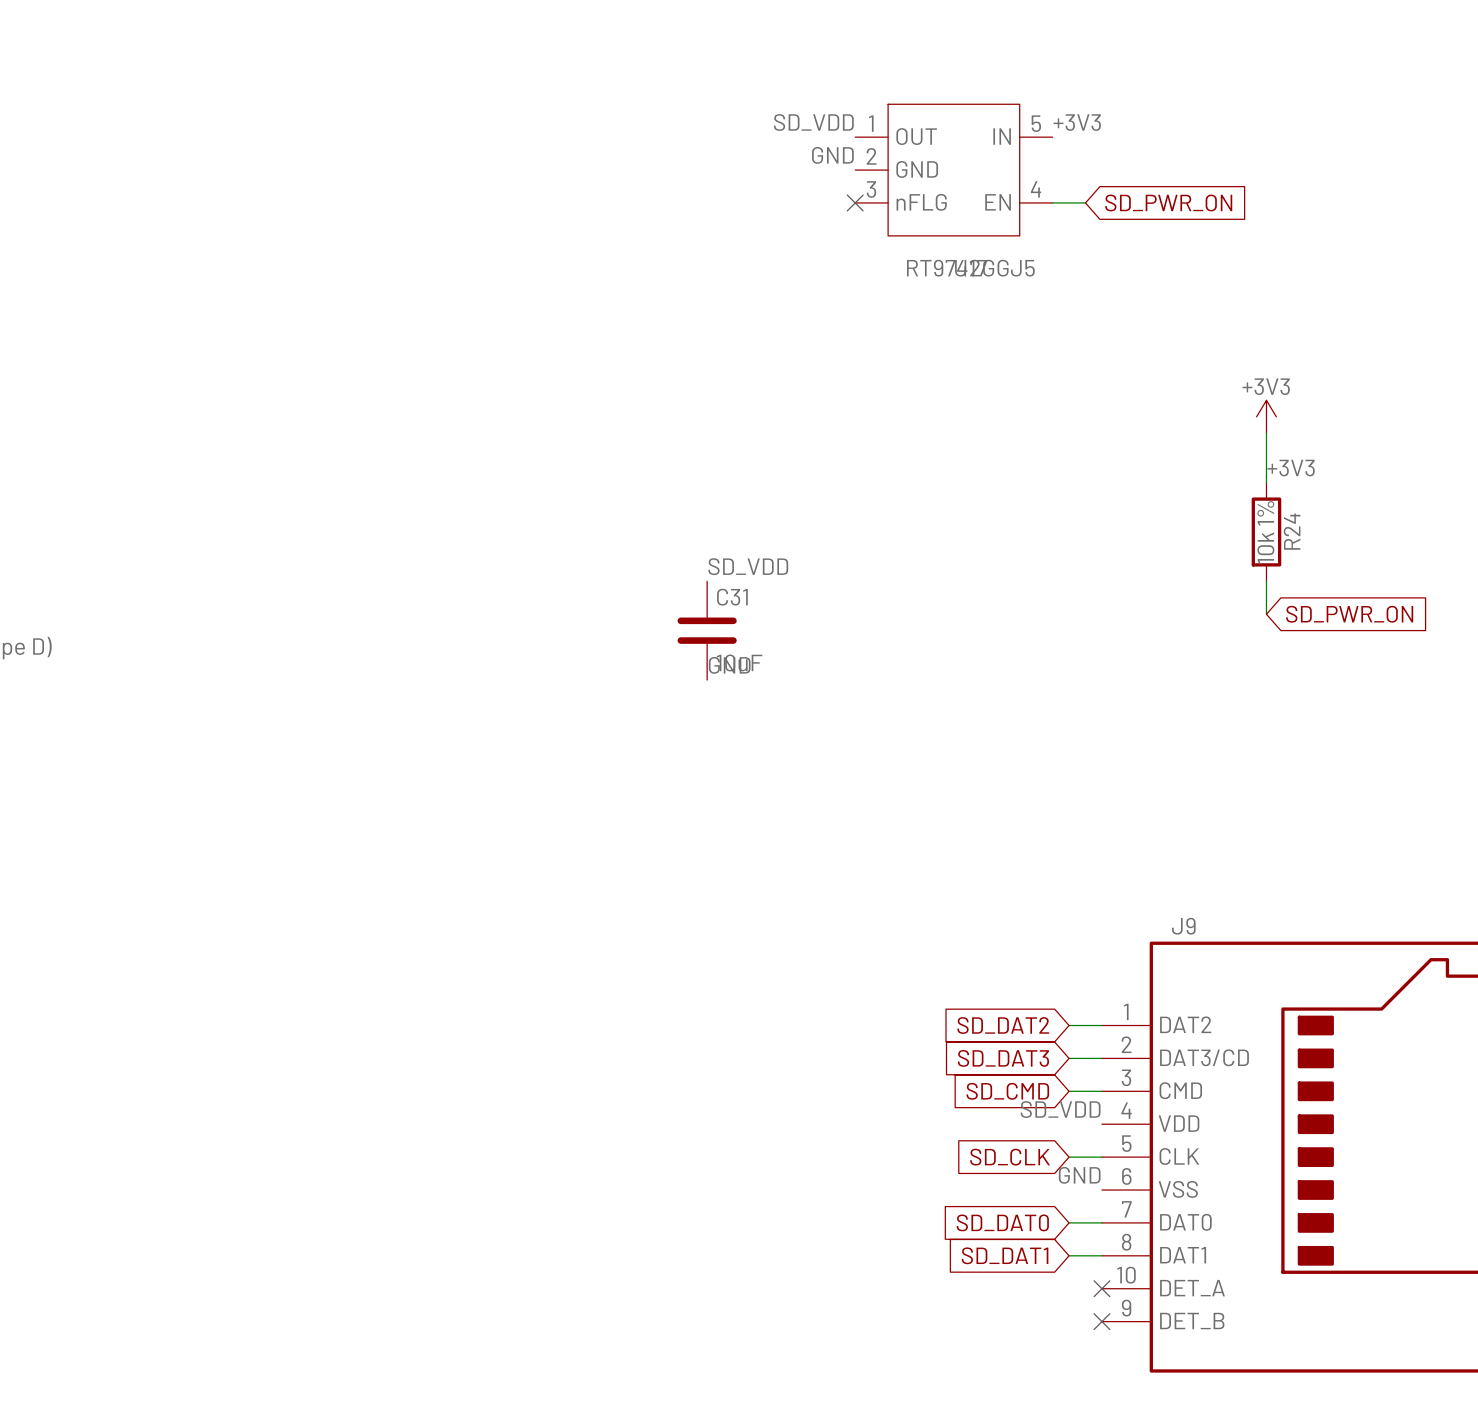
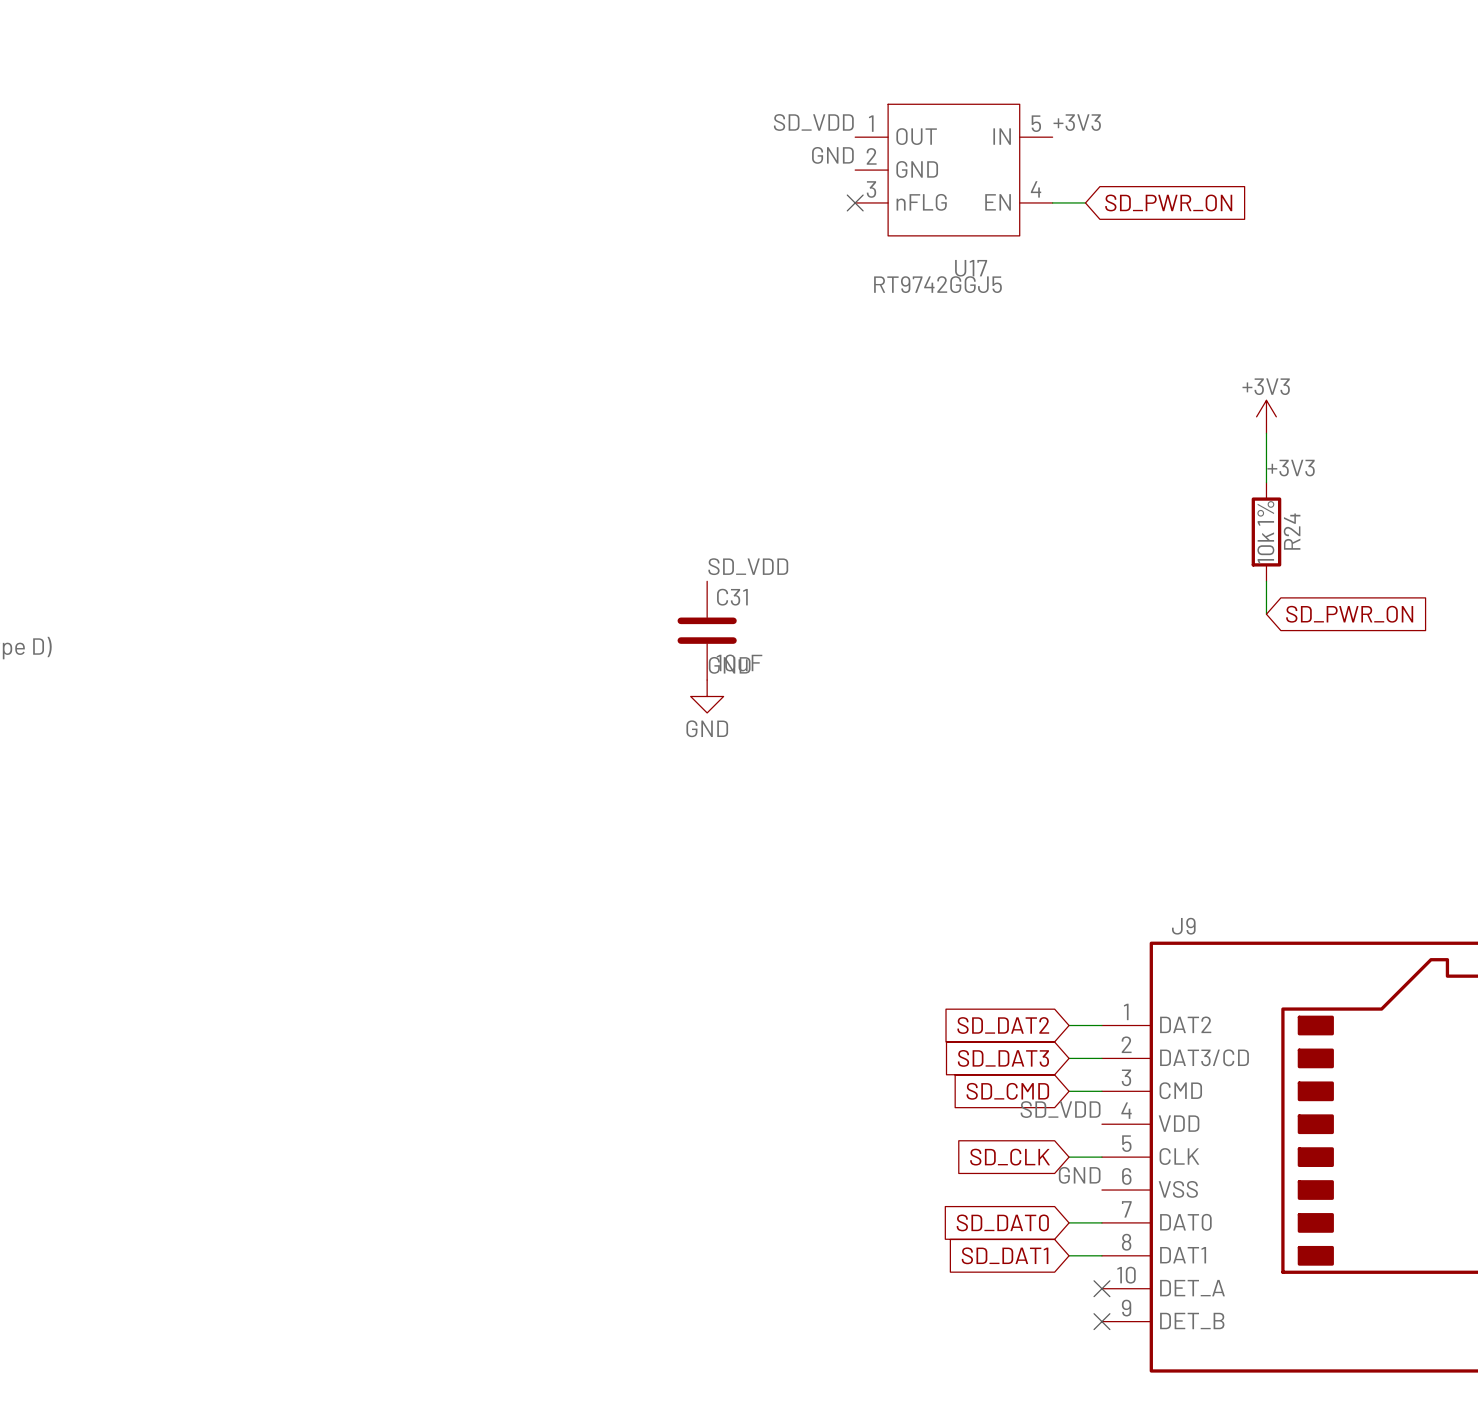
U17 value position: RT9742GGJ5 (970, 268) -> RT9742GGJ5 (937, 284)
power symbol: none -> GND (707, 696)

